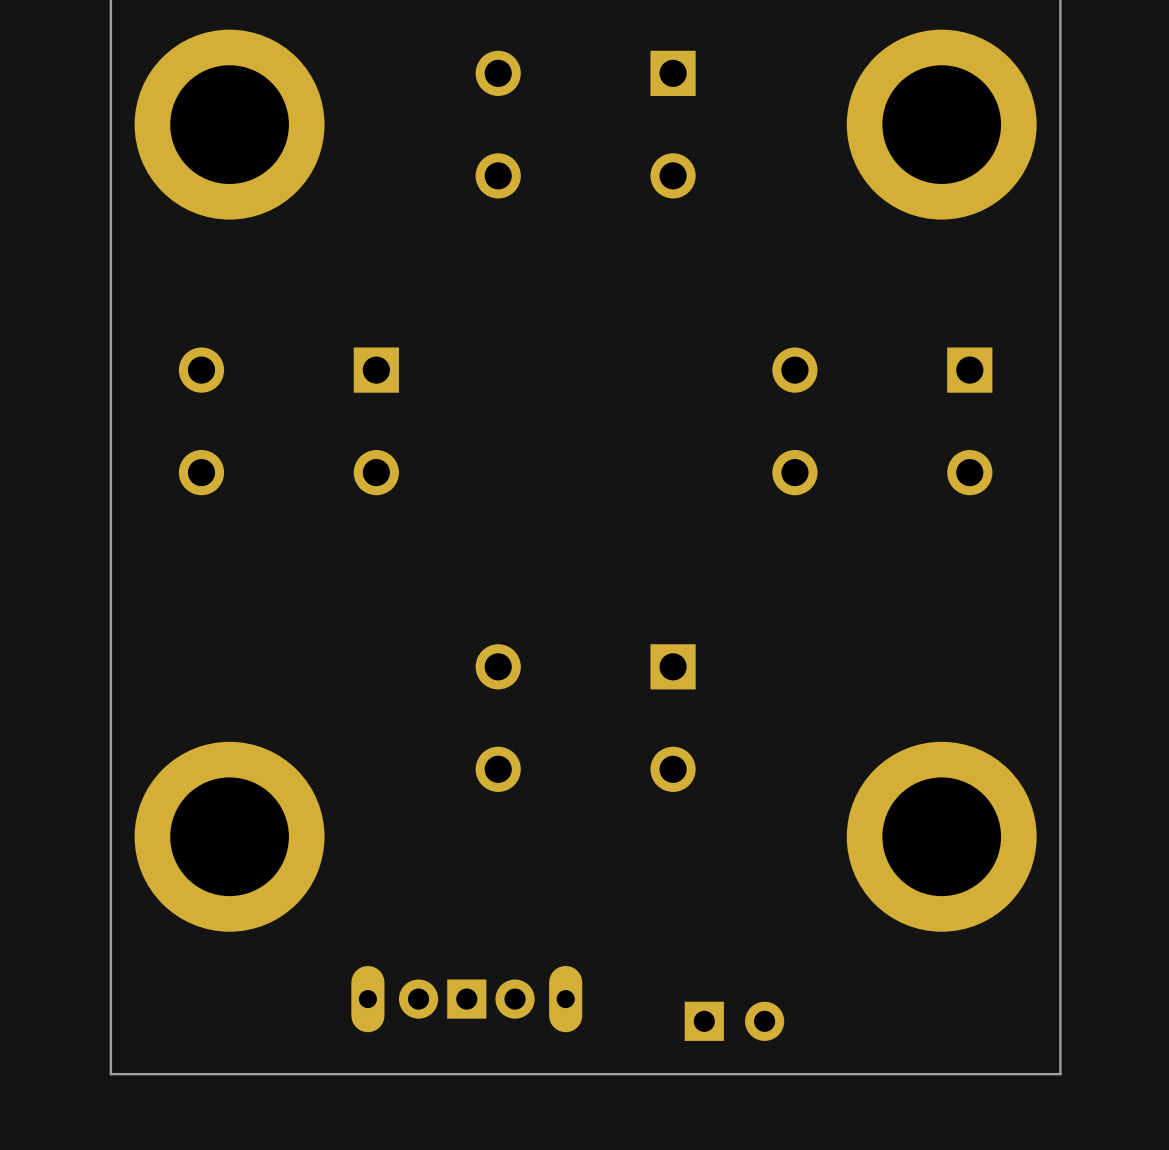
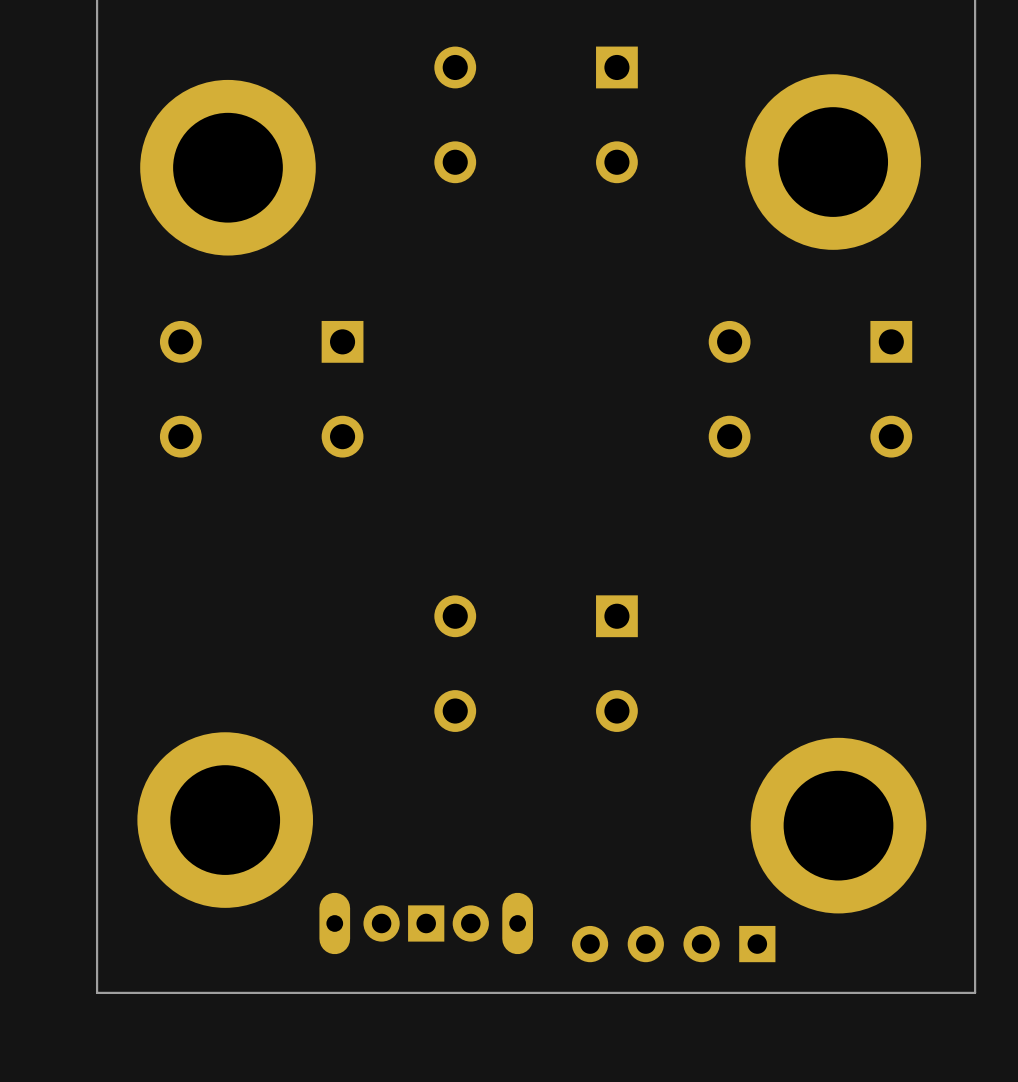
part position: (229, 124) -> (227, 167)
part position: (941, 124) -> (833, 162)
part position: (229, 836) -> (225, 820)
part position: (941, 836) -> (838, 825)
part footprint: [684, 1001, 785, 1041] -> [571, 925, 776, 963]

